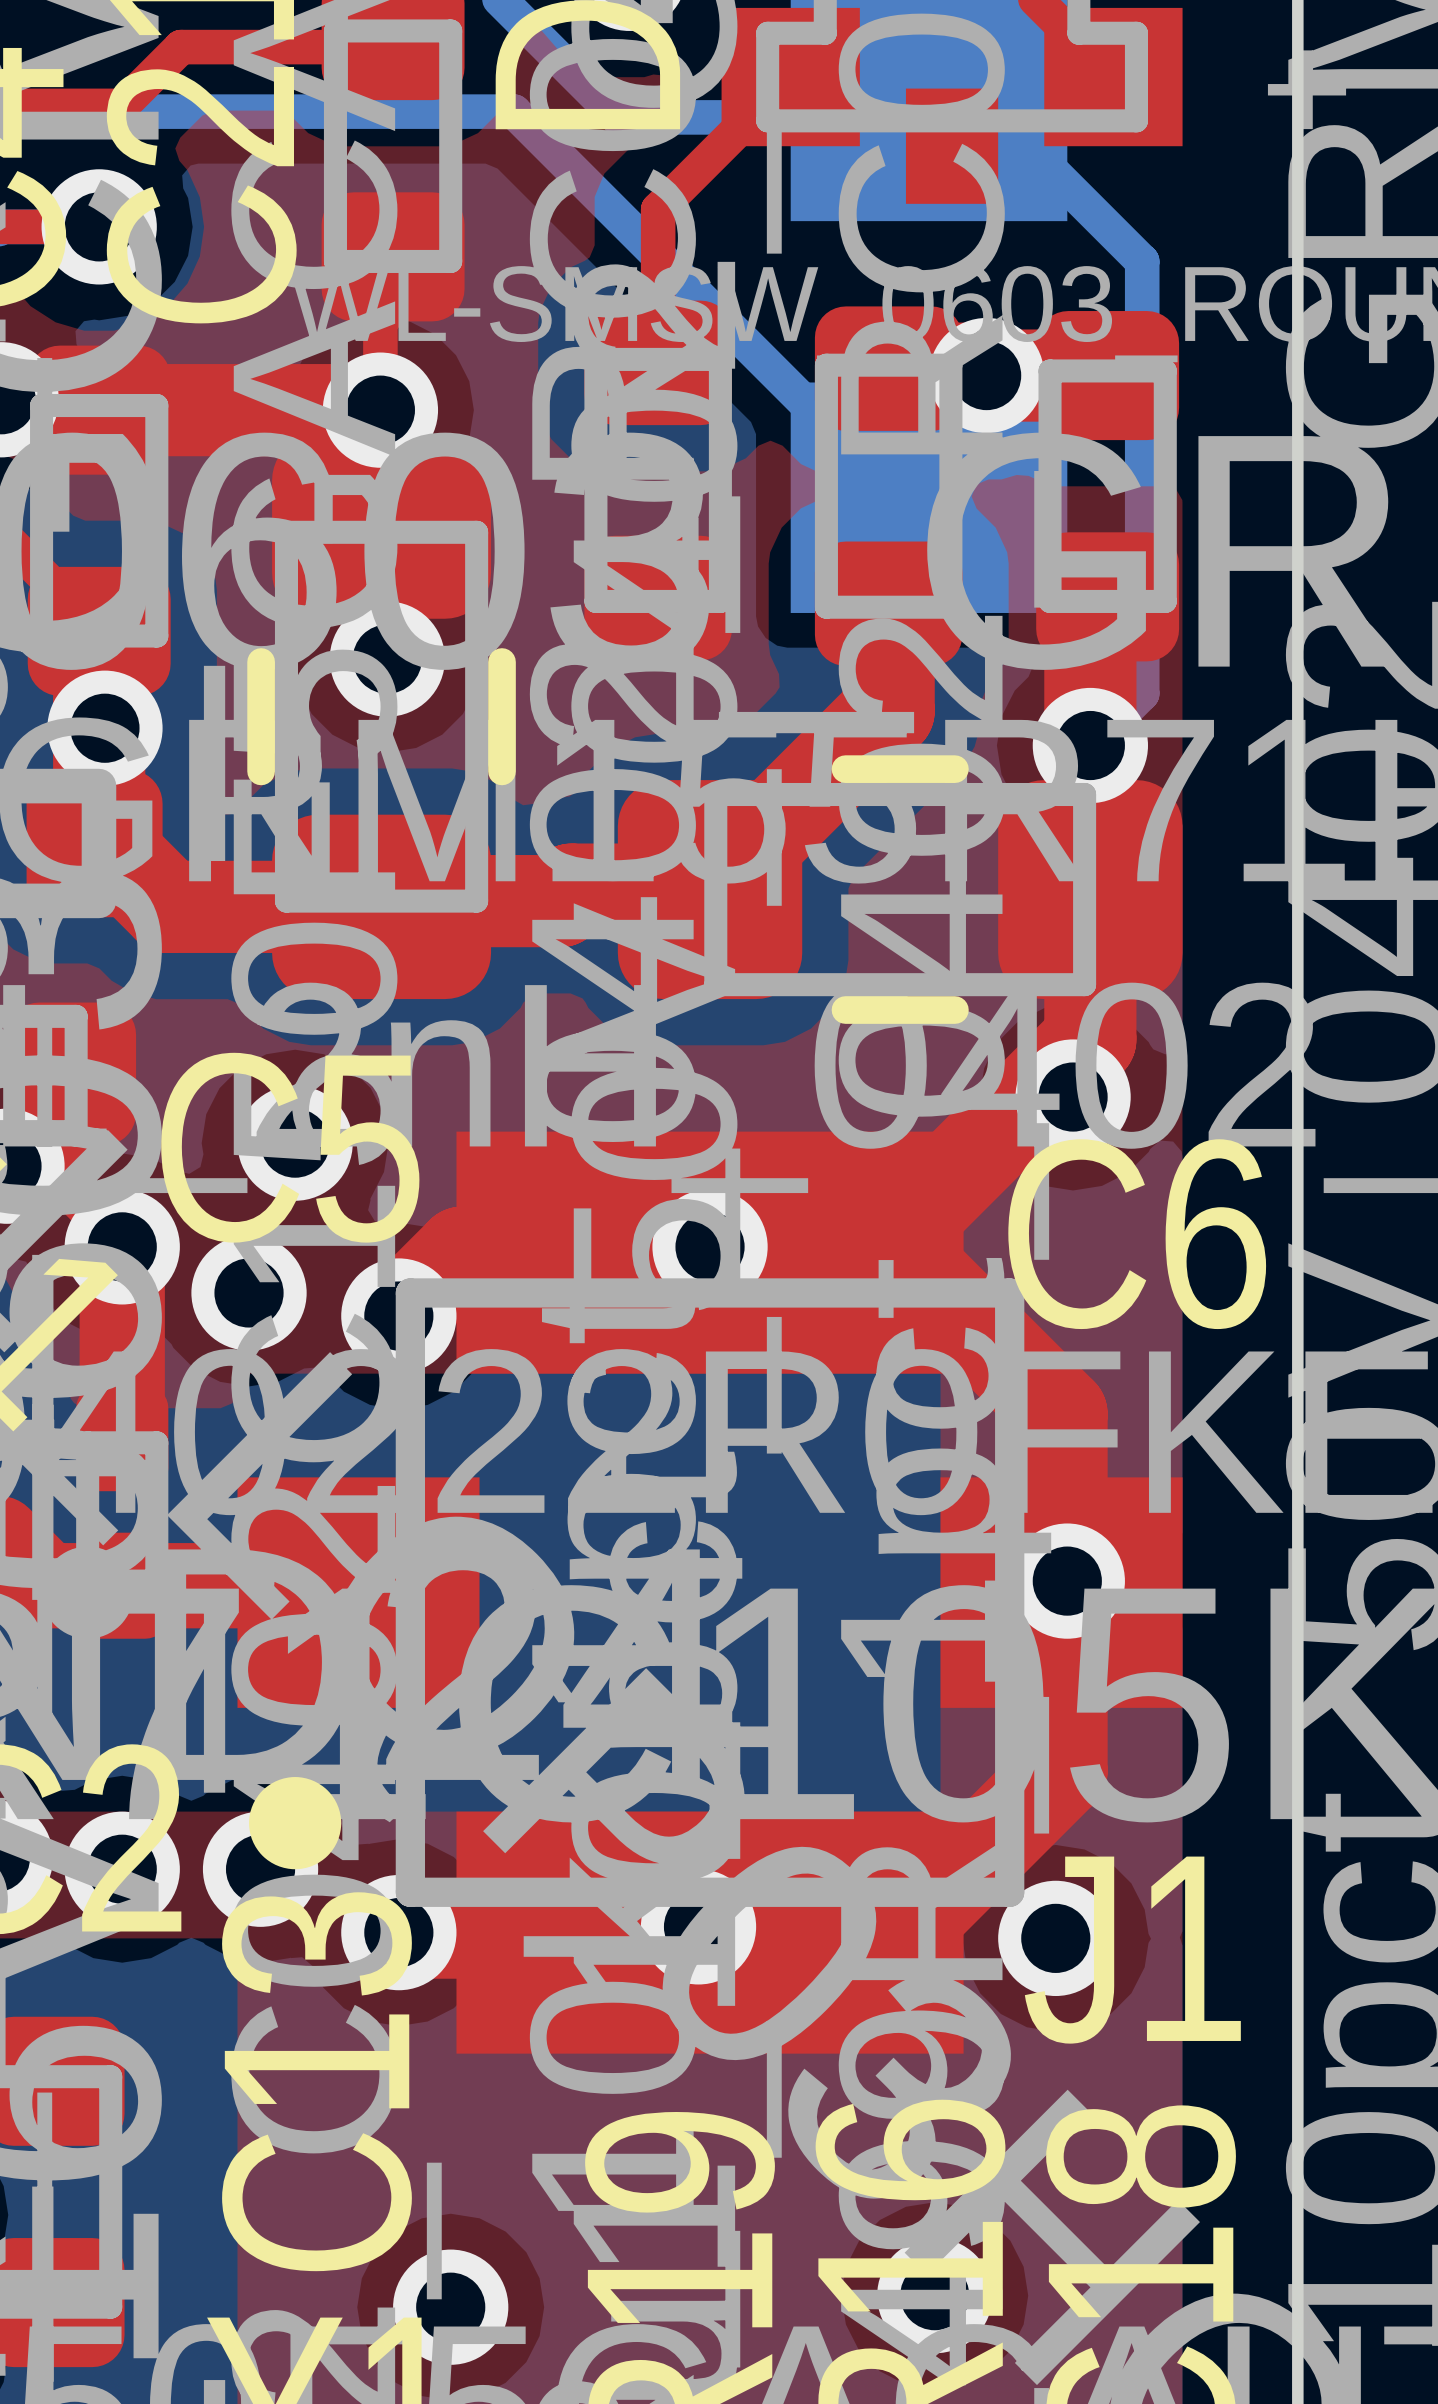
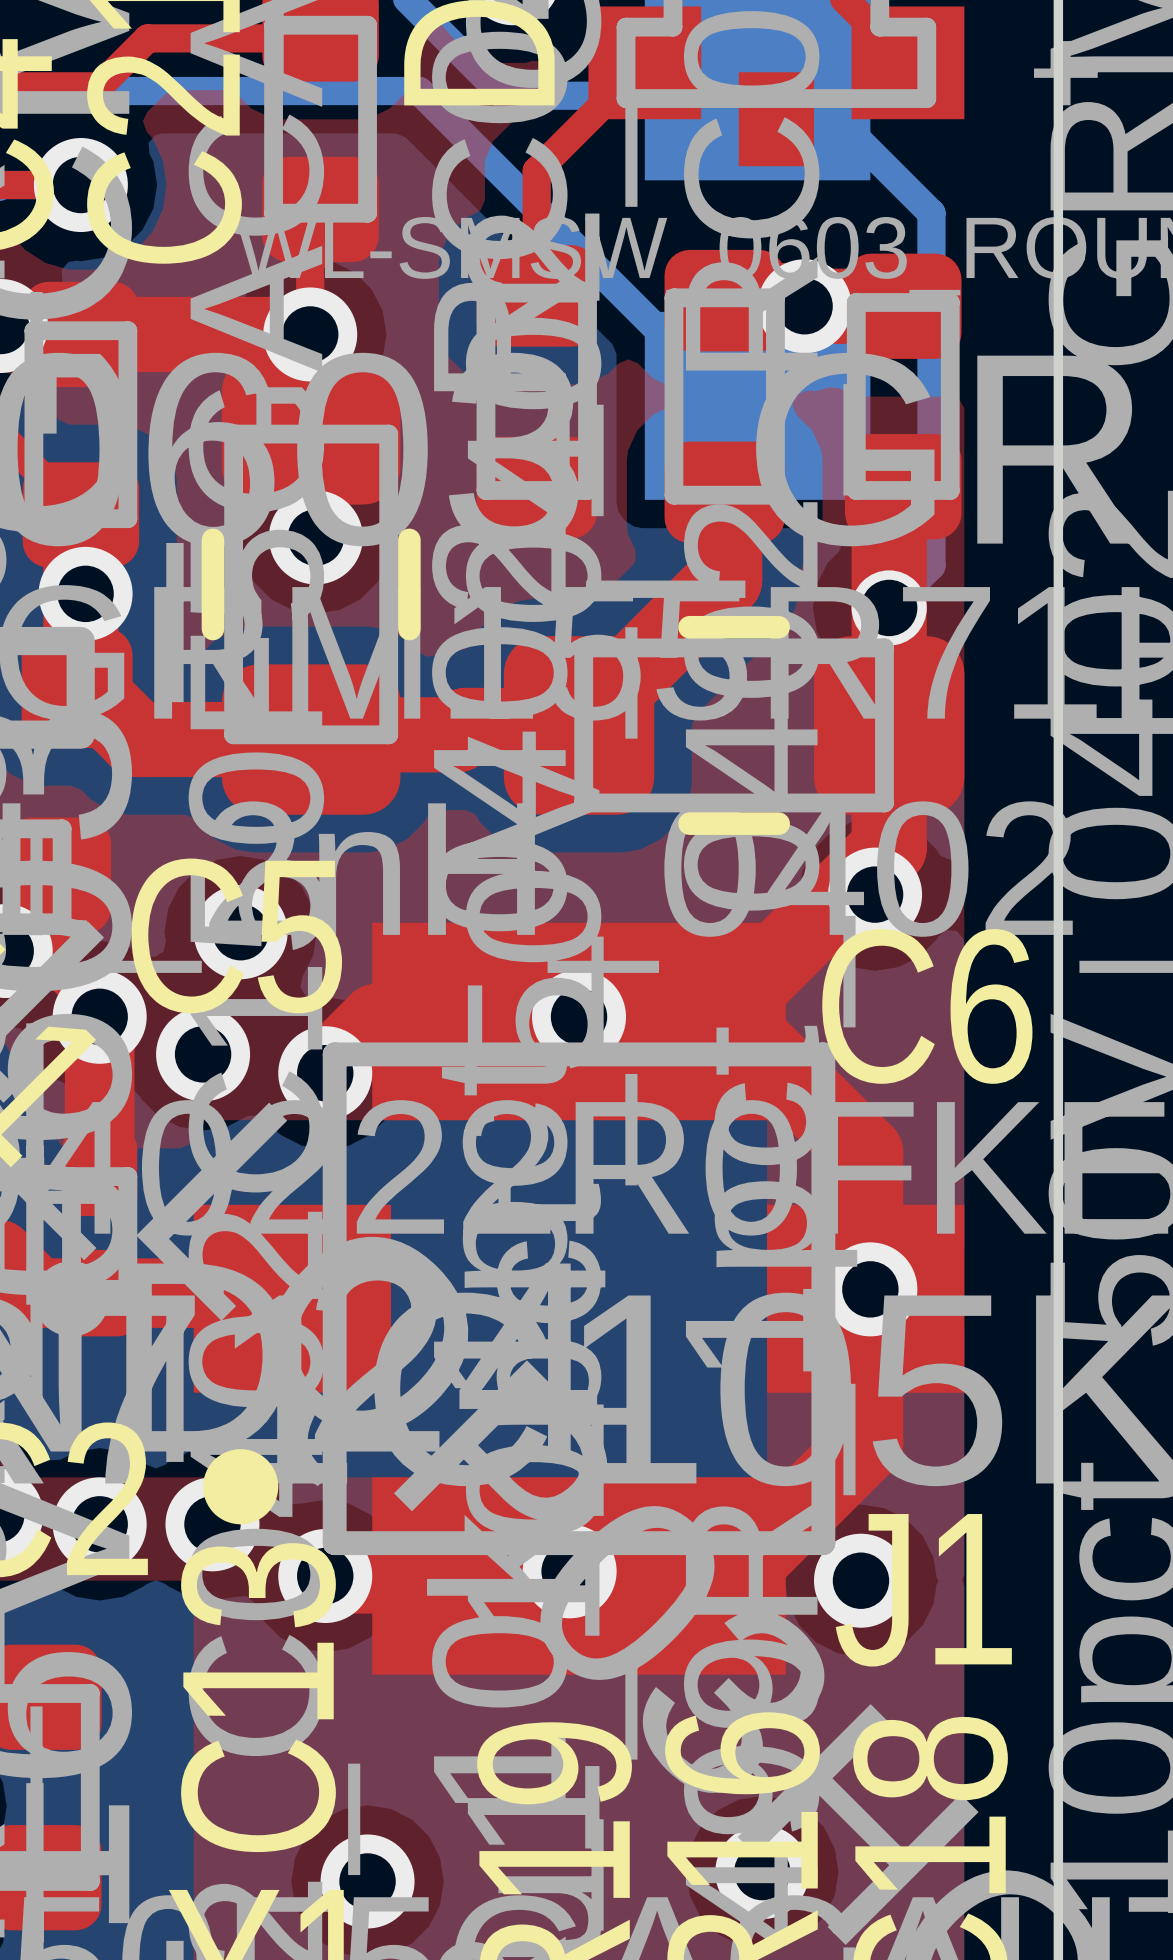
via size: [1032, 687, 1148, 804] -> [851, 570, 927, 646]

